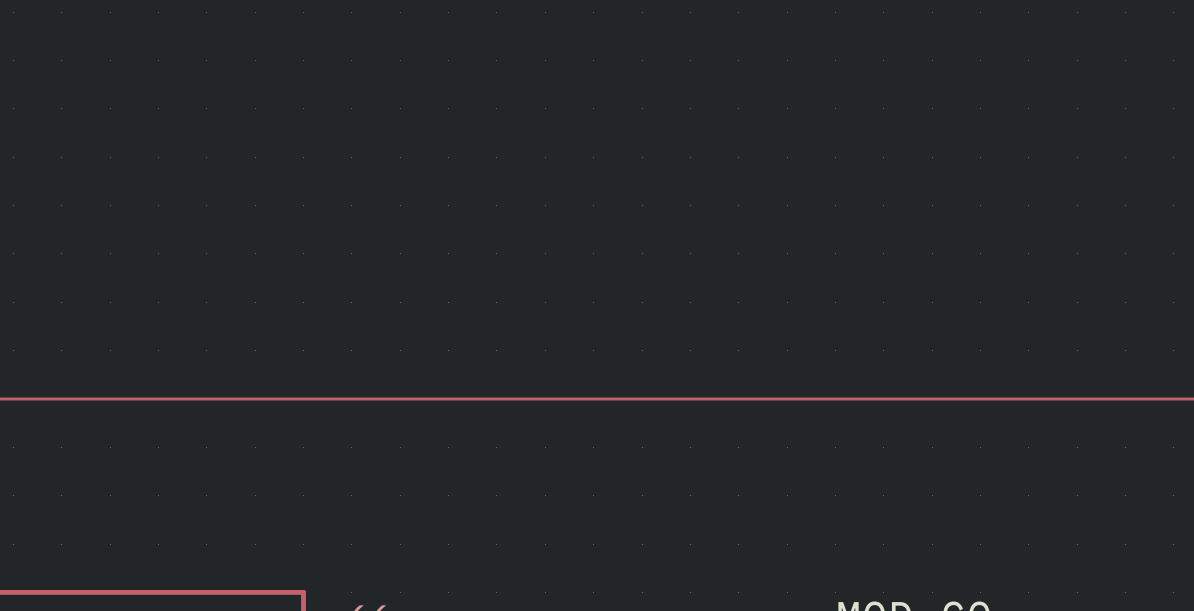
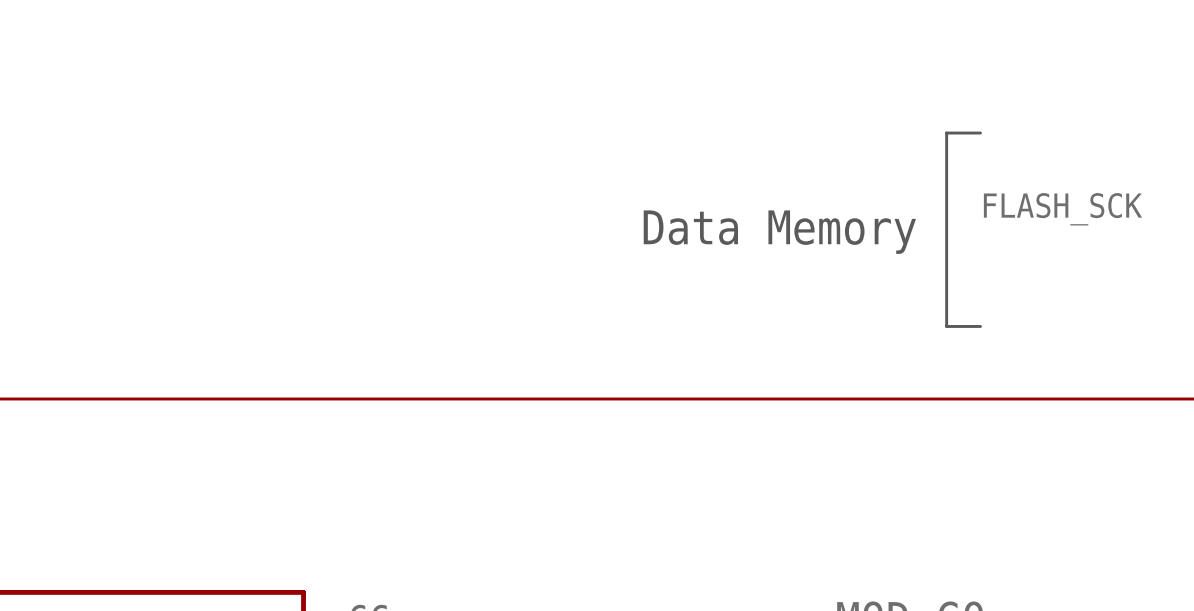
line: none -> (980, 133) (946, 133) (946, 326) (980, 326)
label: none -> FLASH_SCK (1062, 209)
text: none -> Data Memory (779, 232)

